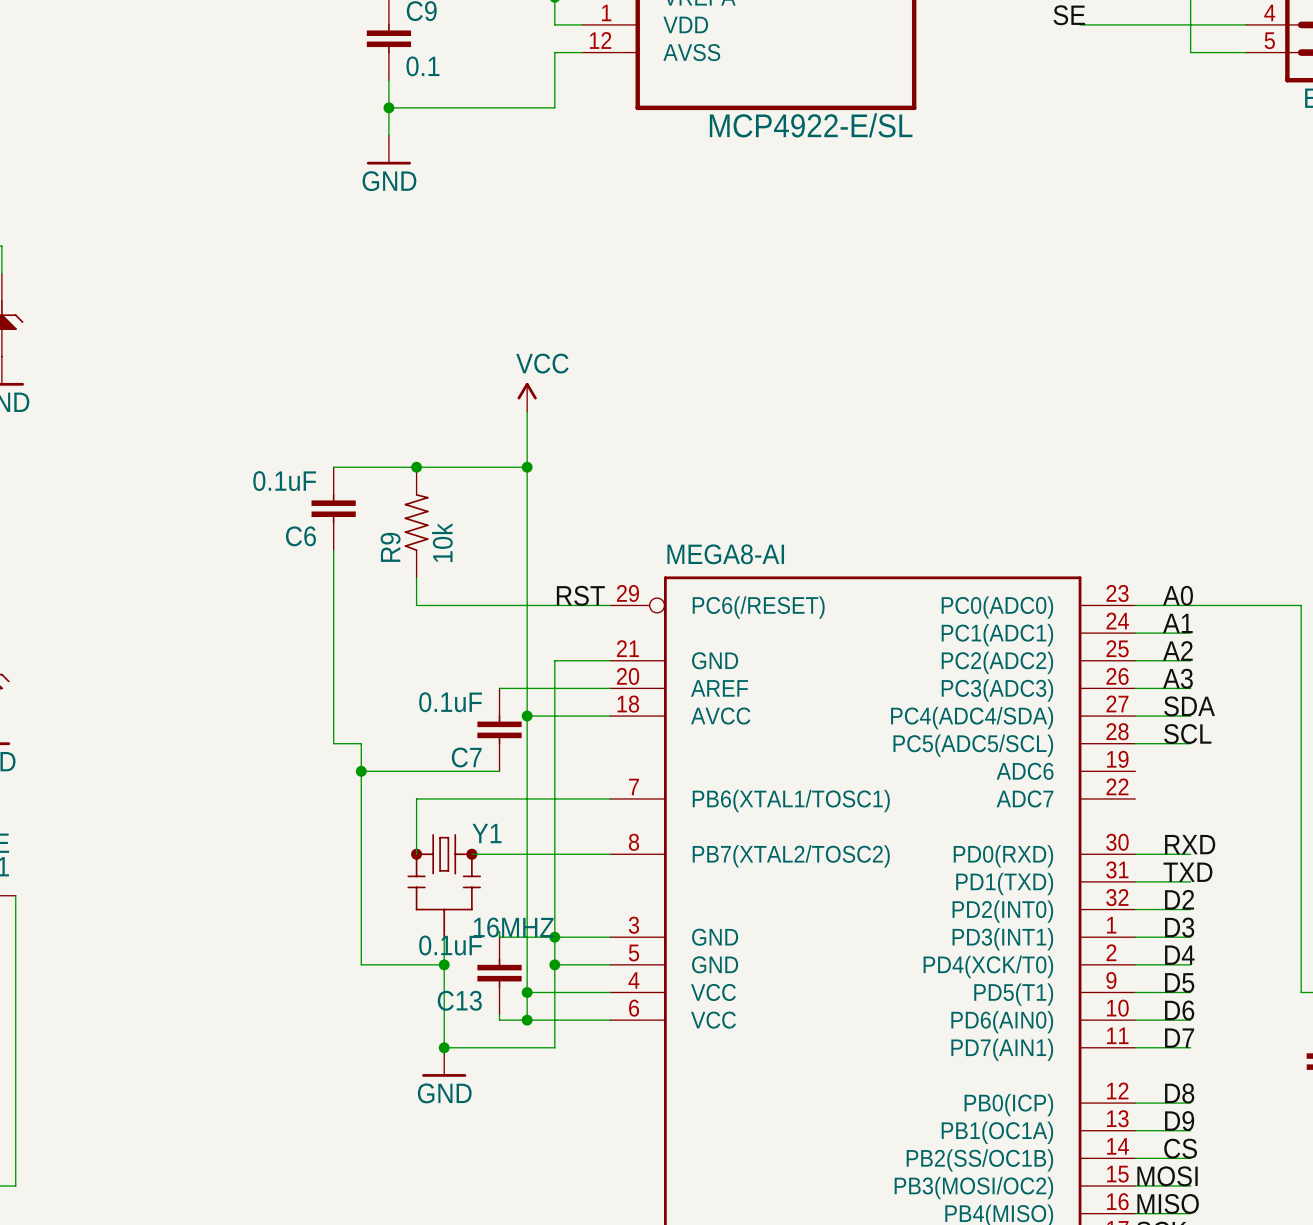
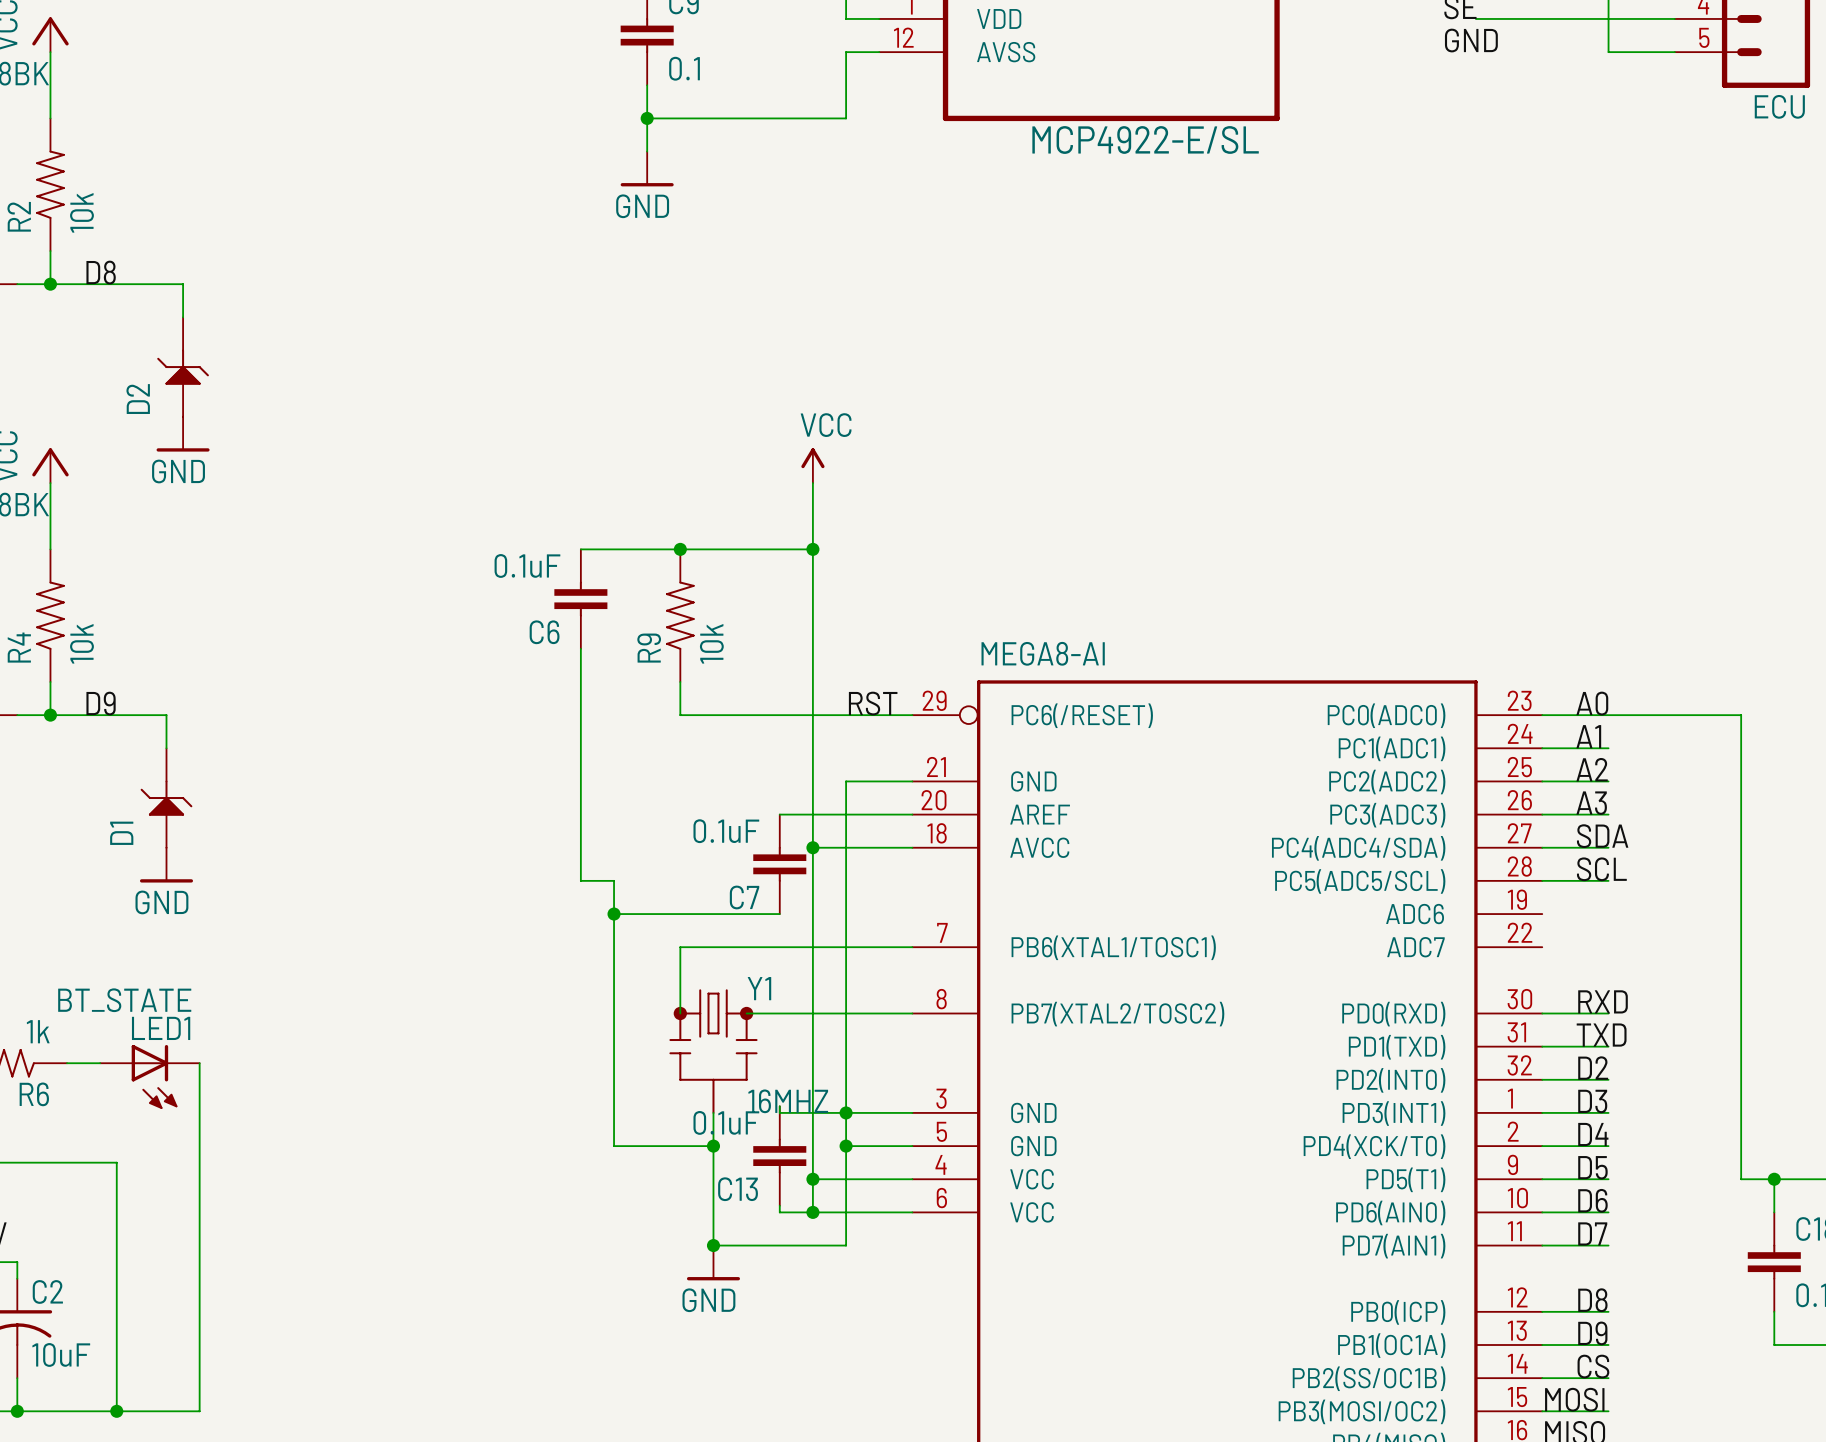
label: none -> GND (1471, 40)

